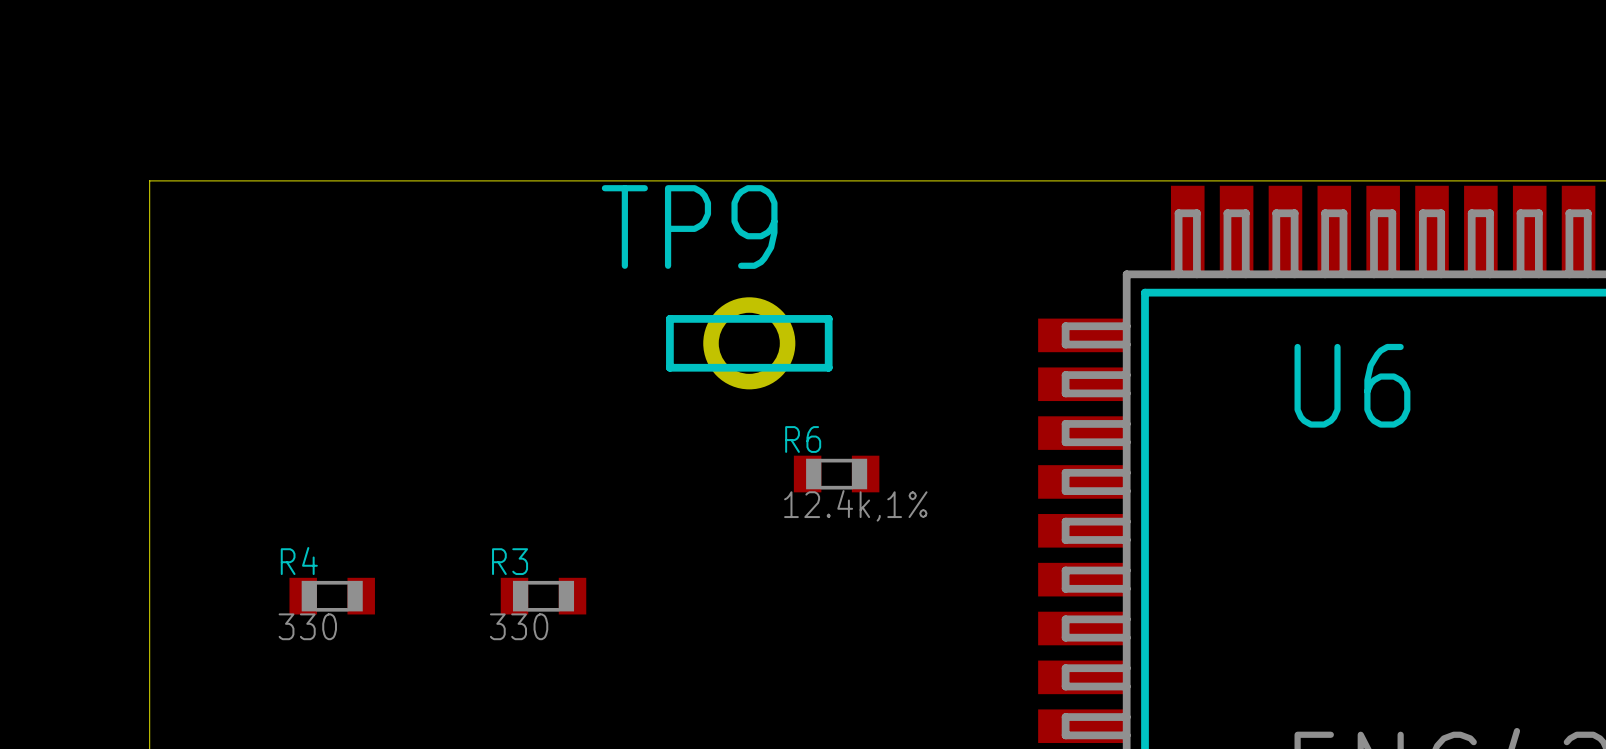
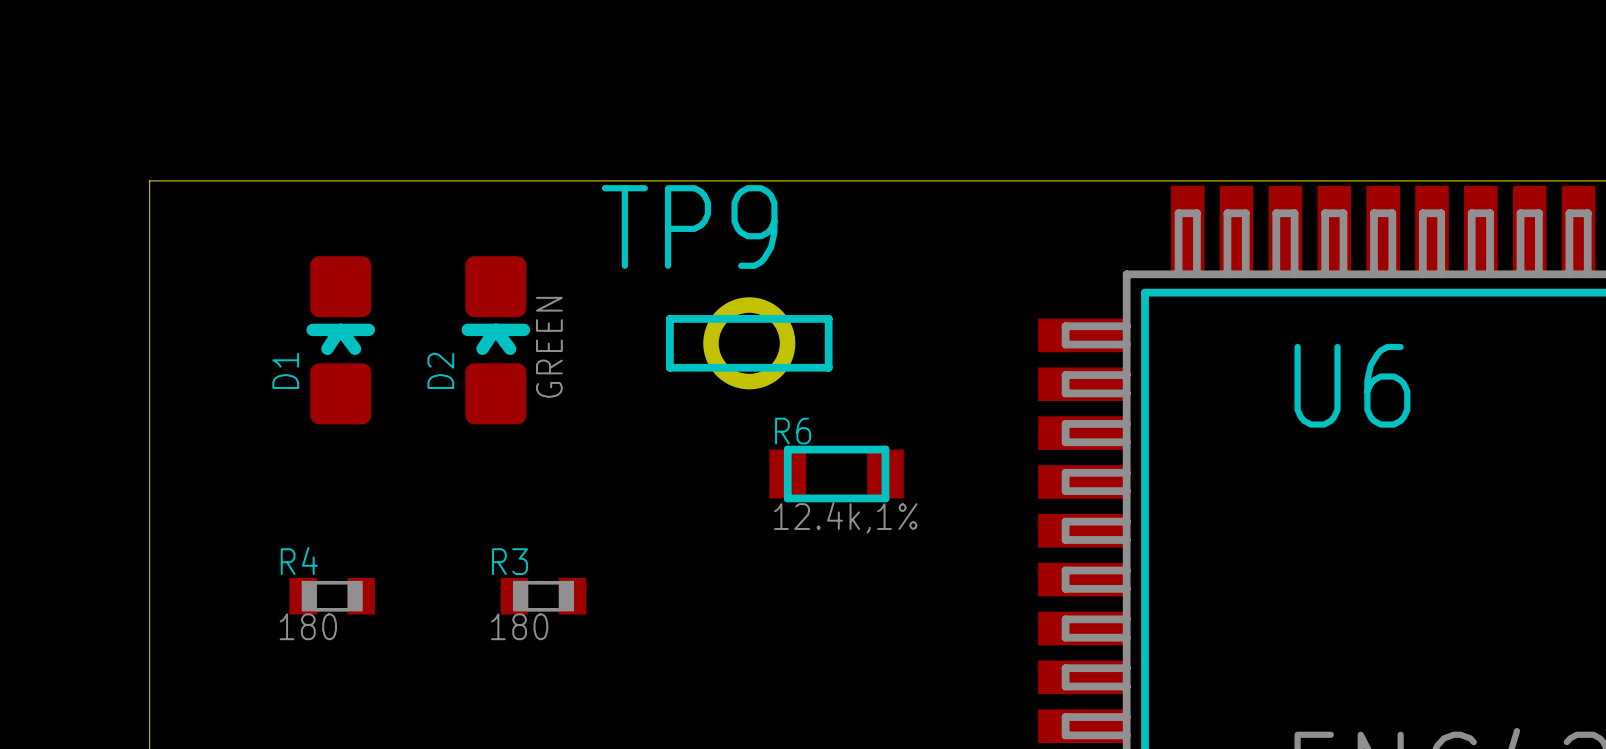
D1: none -> (340, 340)
D2: none -> GREEN (495, 340)
R6 footprint: [793, 455, 880, 493] -> [769, 445, 904, 503]
R4 value: 330 (307, 626) -> 180 (308, 626)
R3 value: 330 (519, 626) -> 180 (519, 626)

